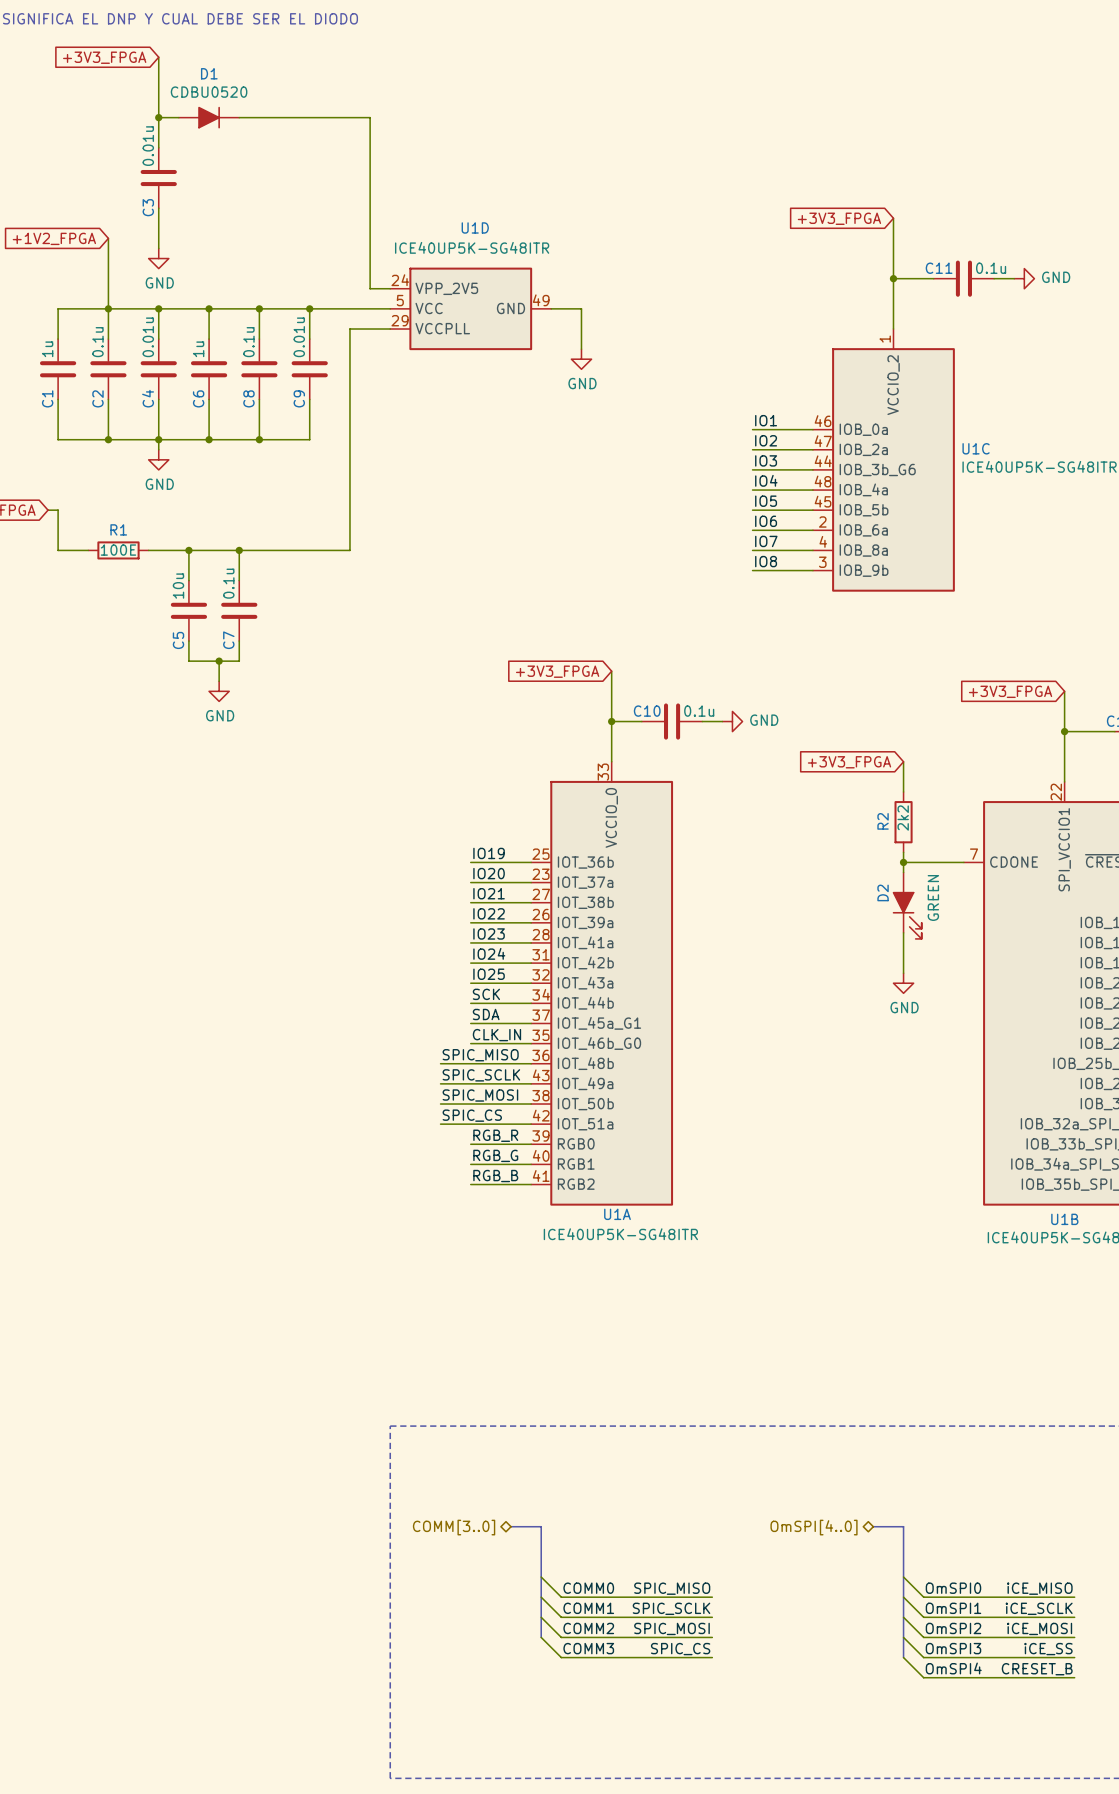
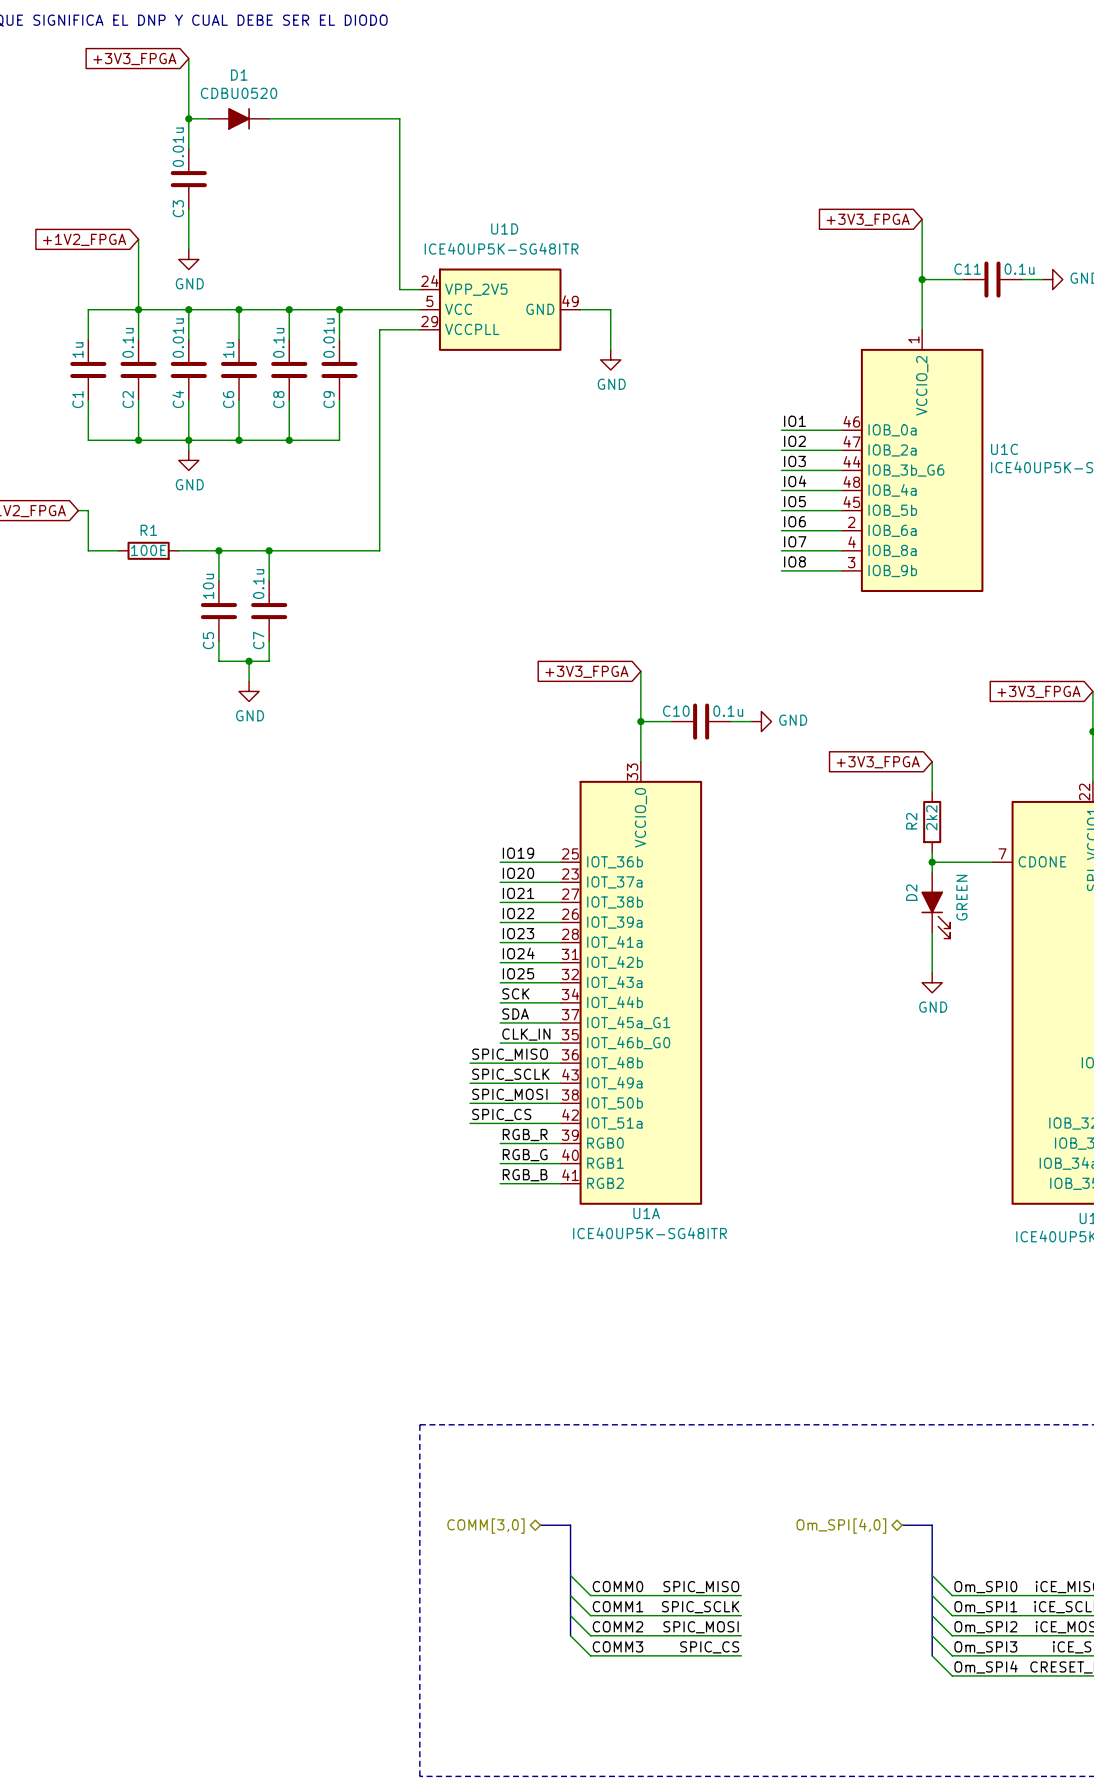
hierarchical label: COMM[3..0] (454, 1527) -> COMM[3,0] (485, 1526)
hierarchical label: OmSPI[4..0] (814, 1527) -> Om_SPI[4,0] (841, 1526)
label: OmSPI0 (953, 1588) -> Om_SPI0 (985, 1587)
label: OmSPI1 (953, 1608) -> Om_SPI1 (985, 1607)
label: OmSPI2 (953, 1628) -> Om_SPI2 (985, 1627)
label: OmSPI3 (953, 1648) -> Om_SPI3 (985, 1647)
label: OmSPI4 (953, 1668) -> Om_SPI4 (986, 1667)

